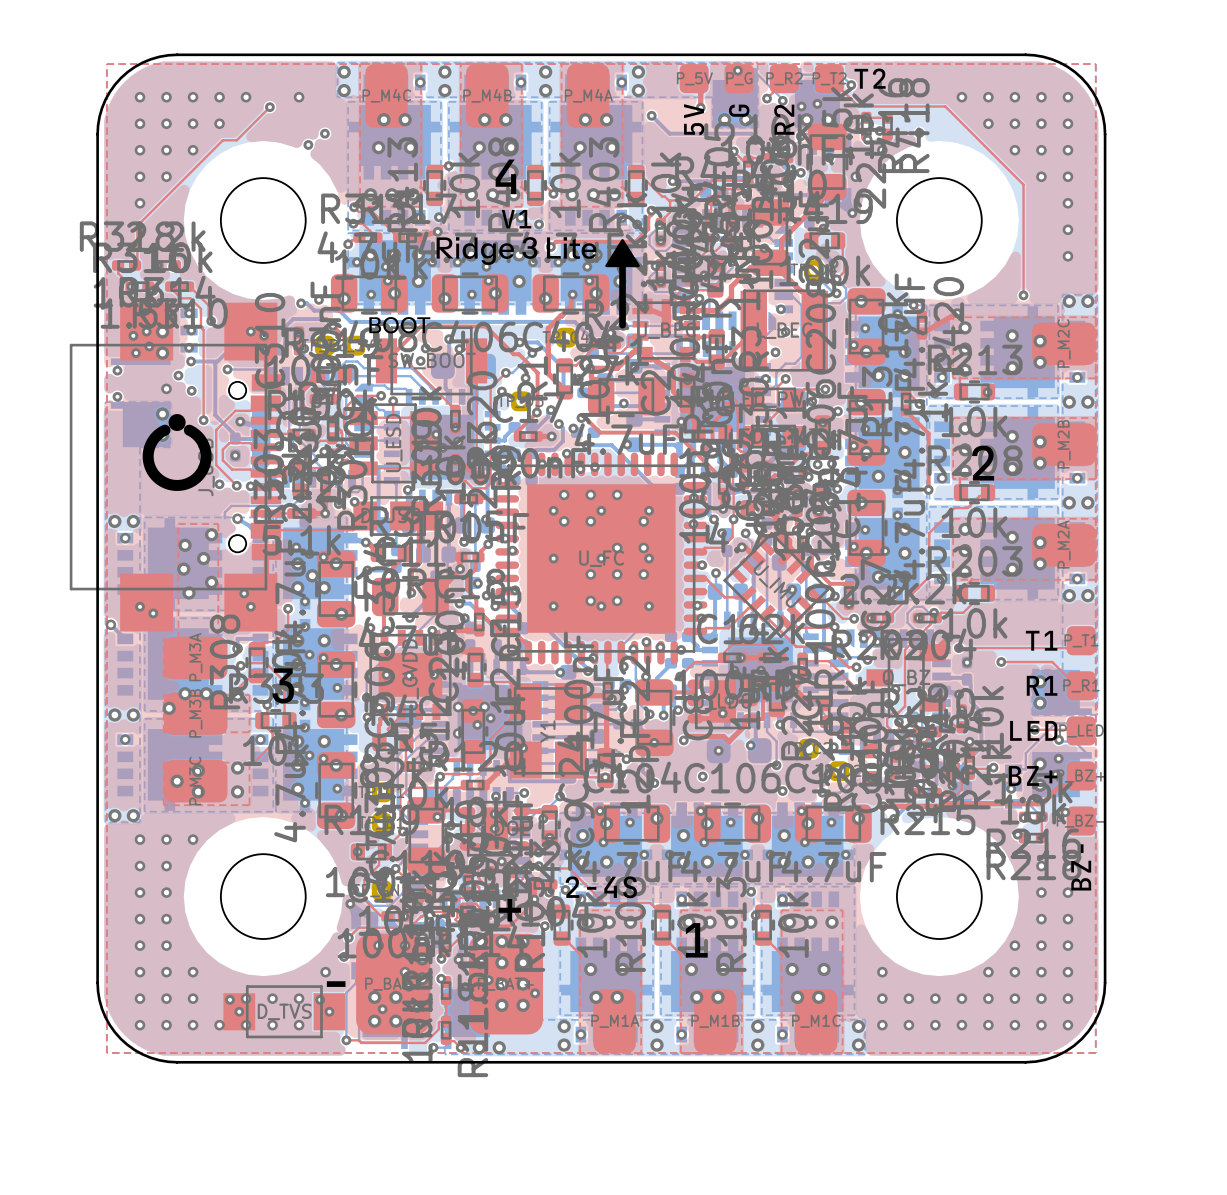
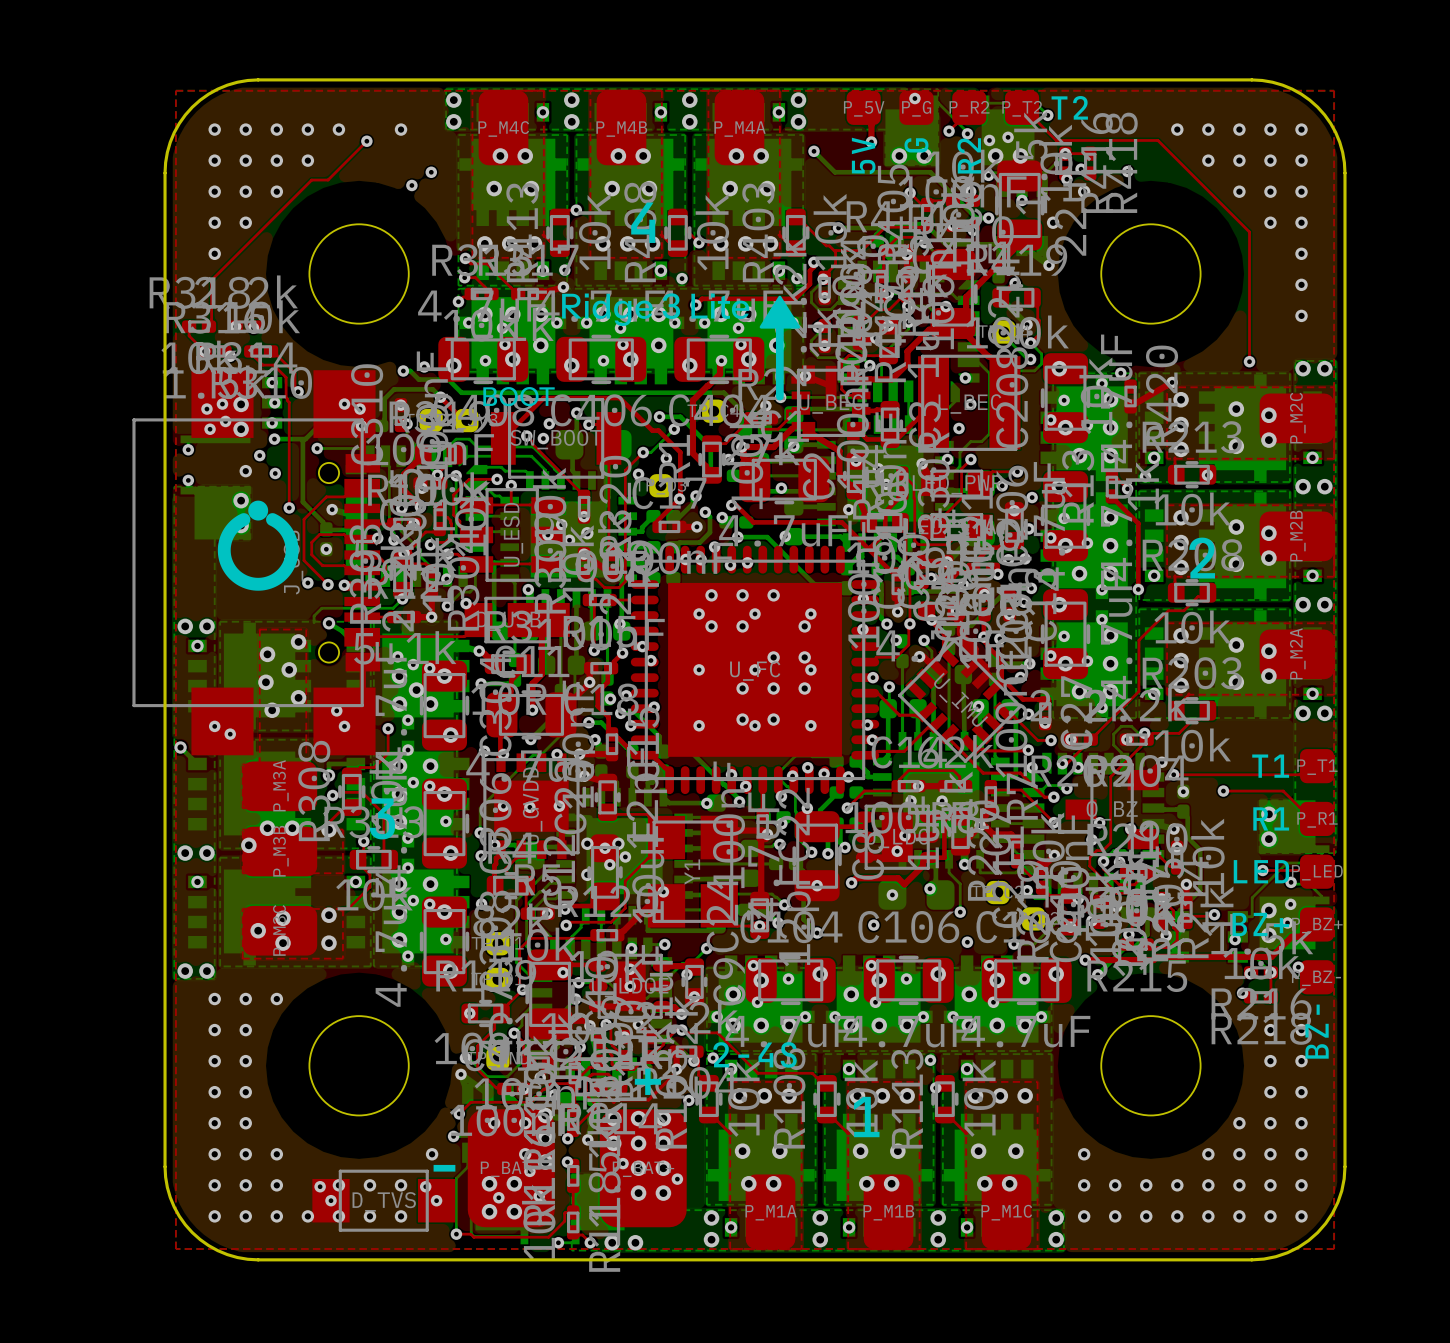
drawing: [501, 209, 532, 229] -> none

